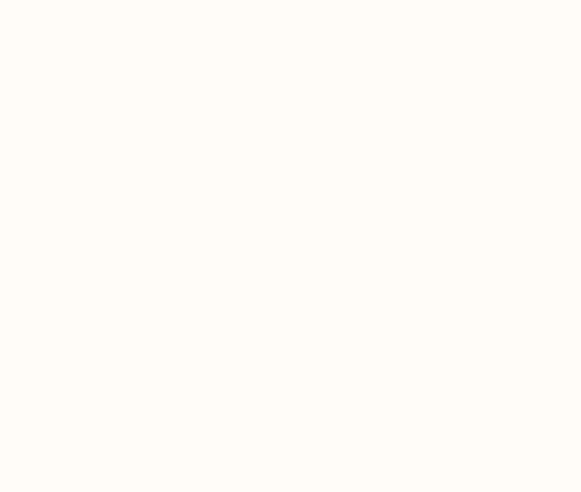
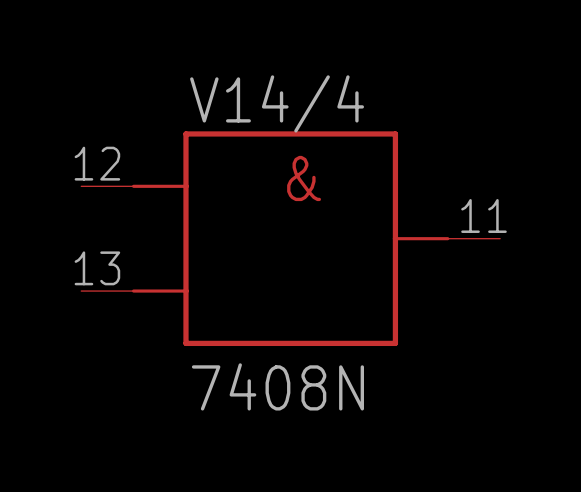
V14/4: none -> 7408N (290, 238)

